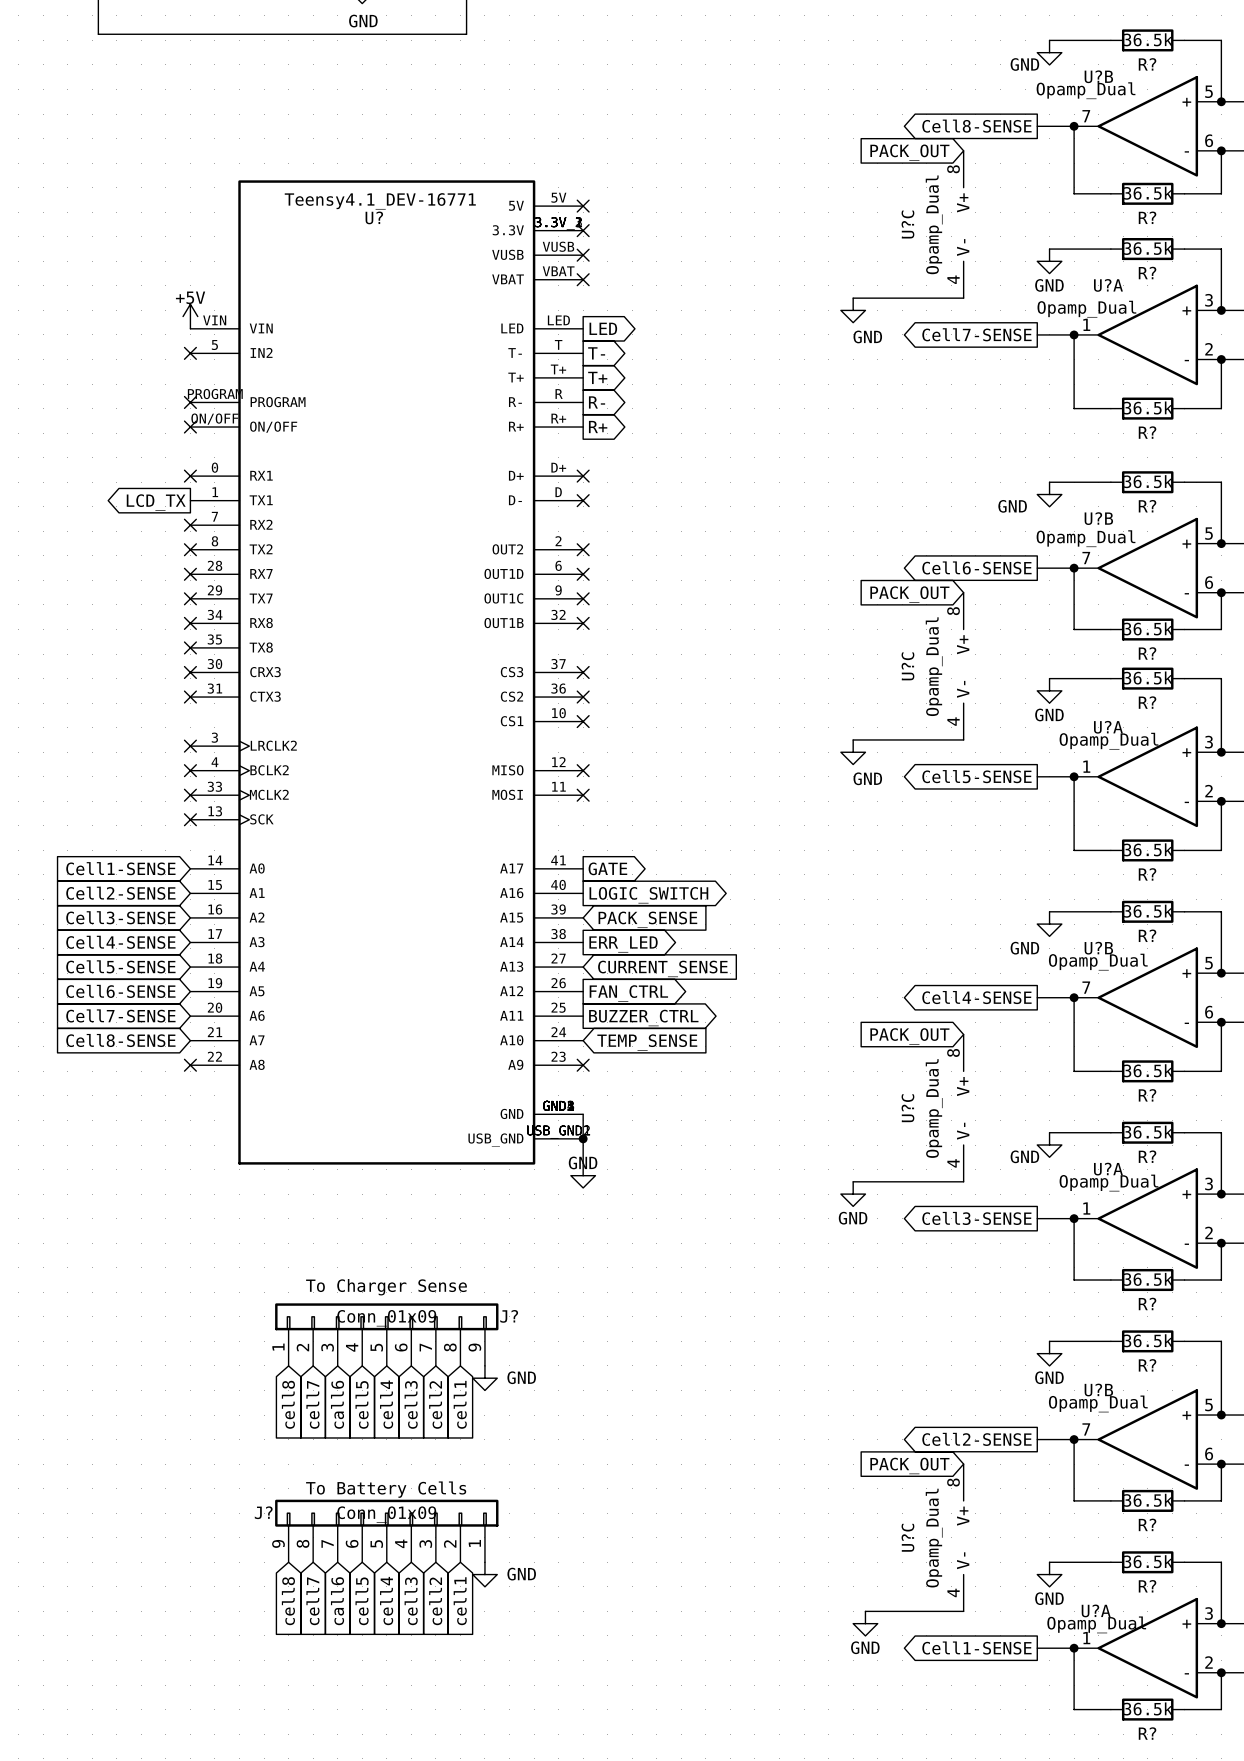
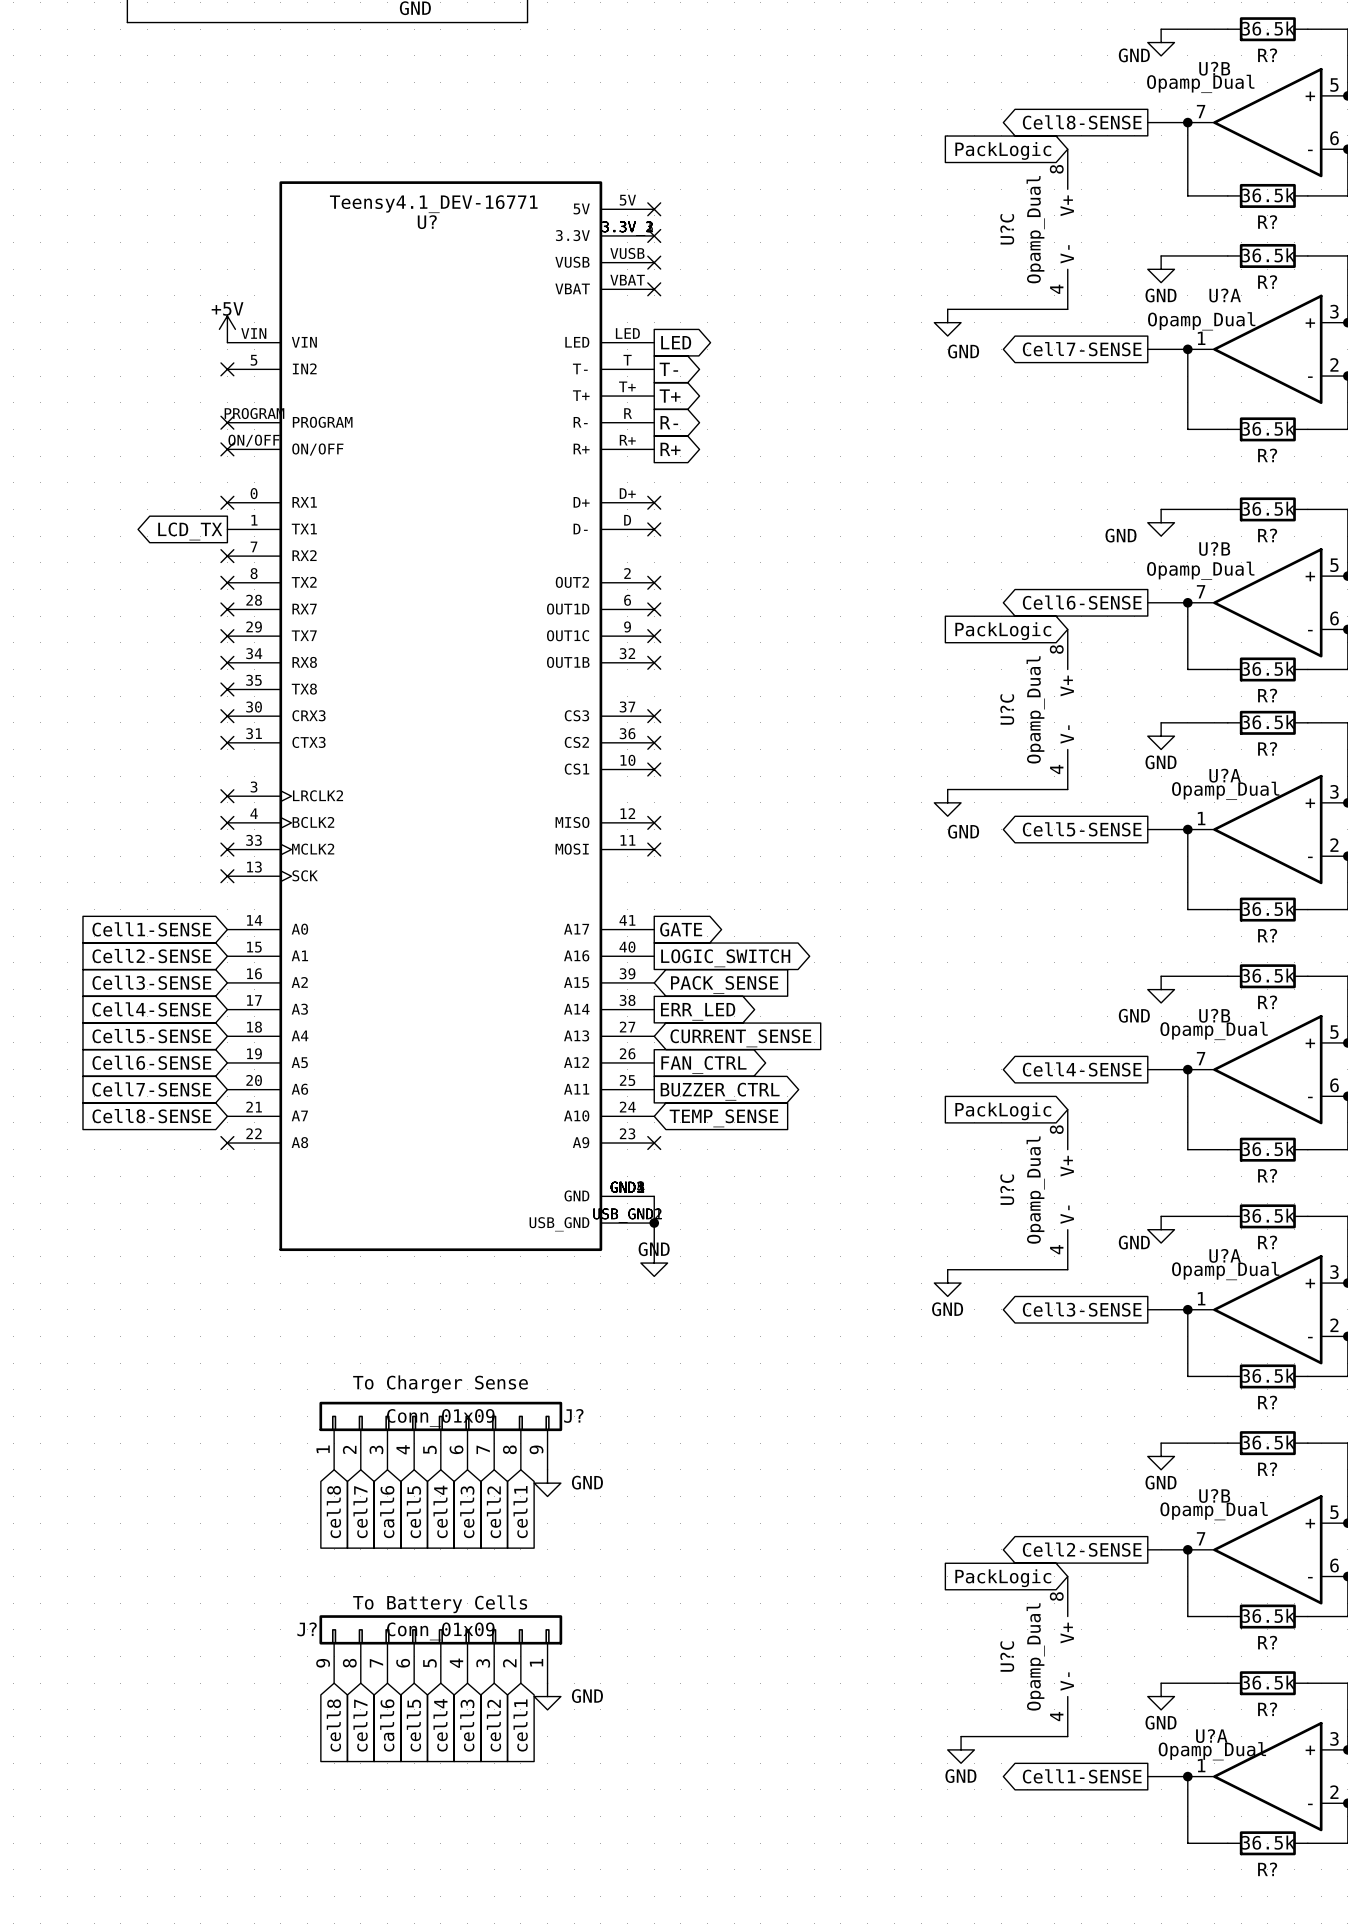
global label: PACK_OUT (909, 152) -> PackLogic (1003, 150)
global label: PACK_OUT (909, 594) -> PackLogic (1003, 631)
global label: PACK_OUT (909, 1036) -> PackLogic (1003, 1111)
global label: PACK_OUT (909, 1465) -> PackLogic (1003, 1578)

